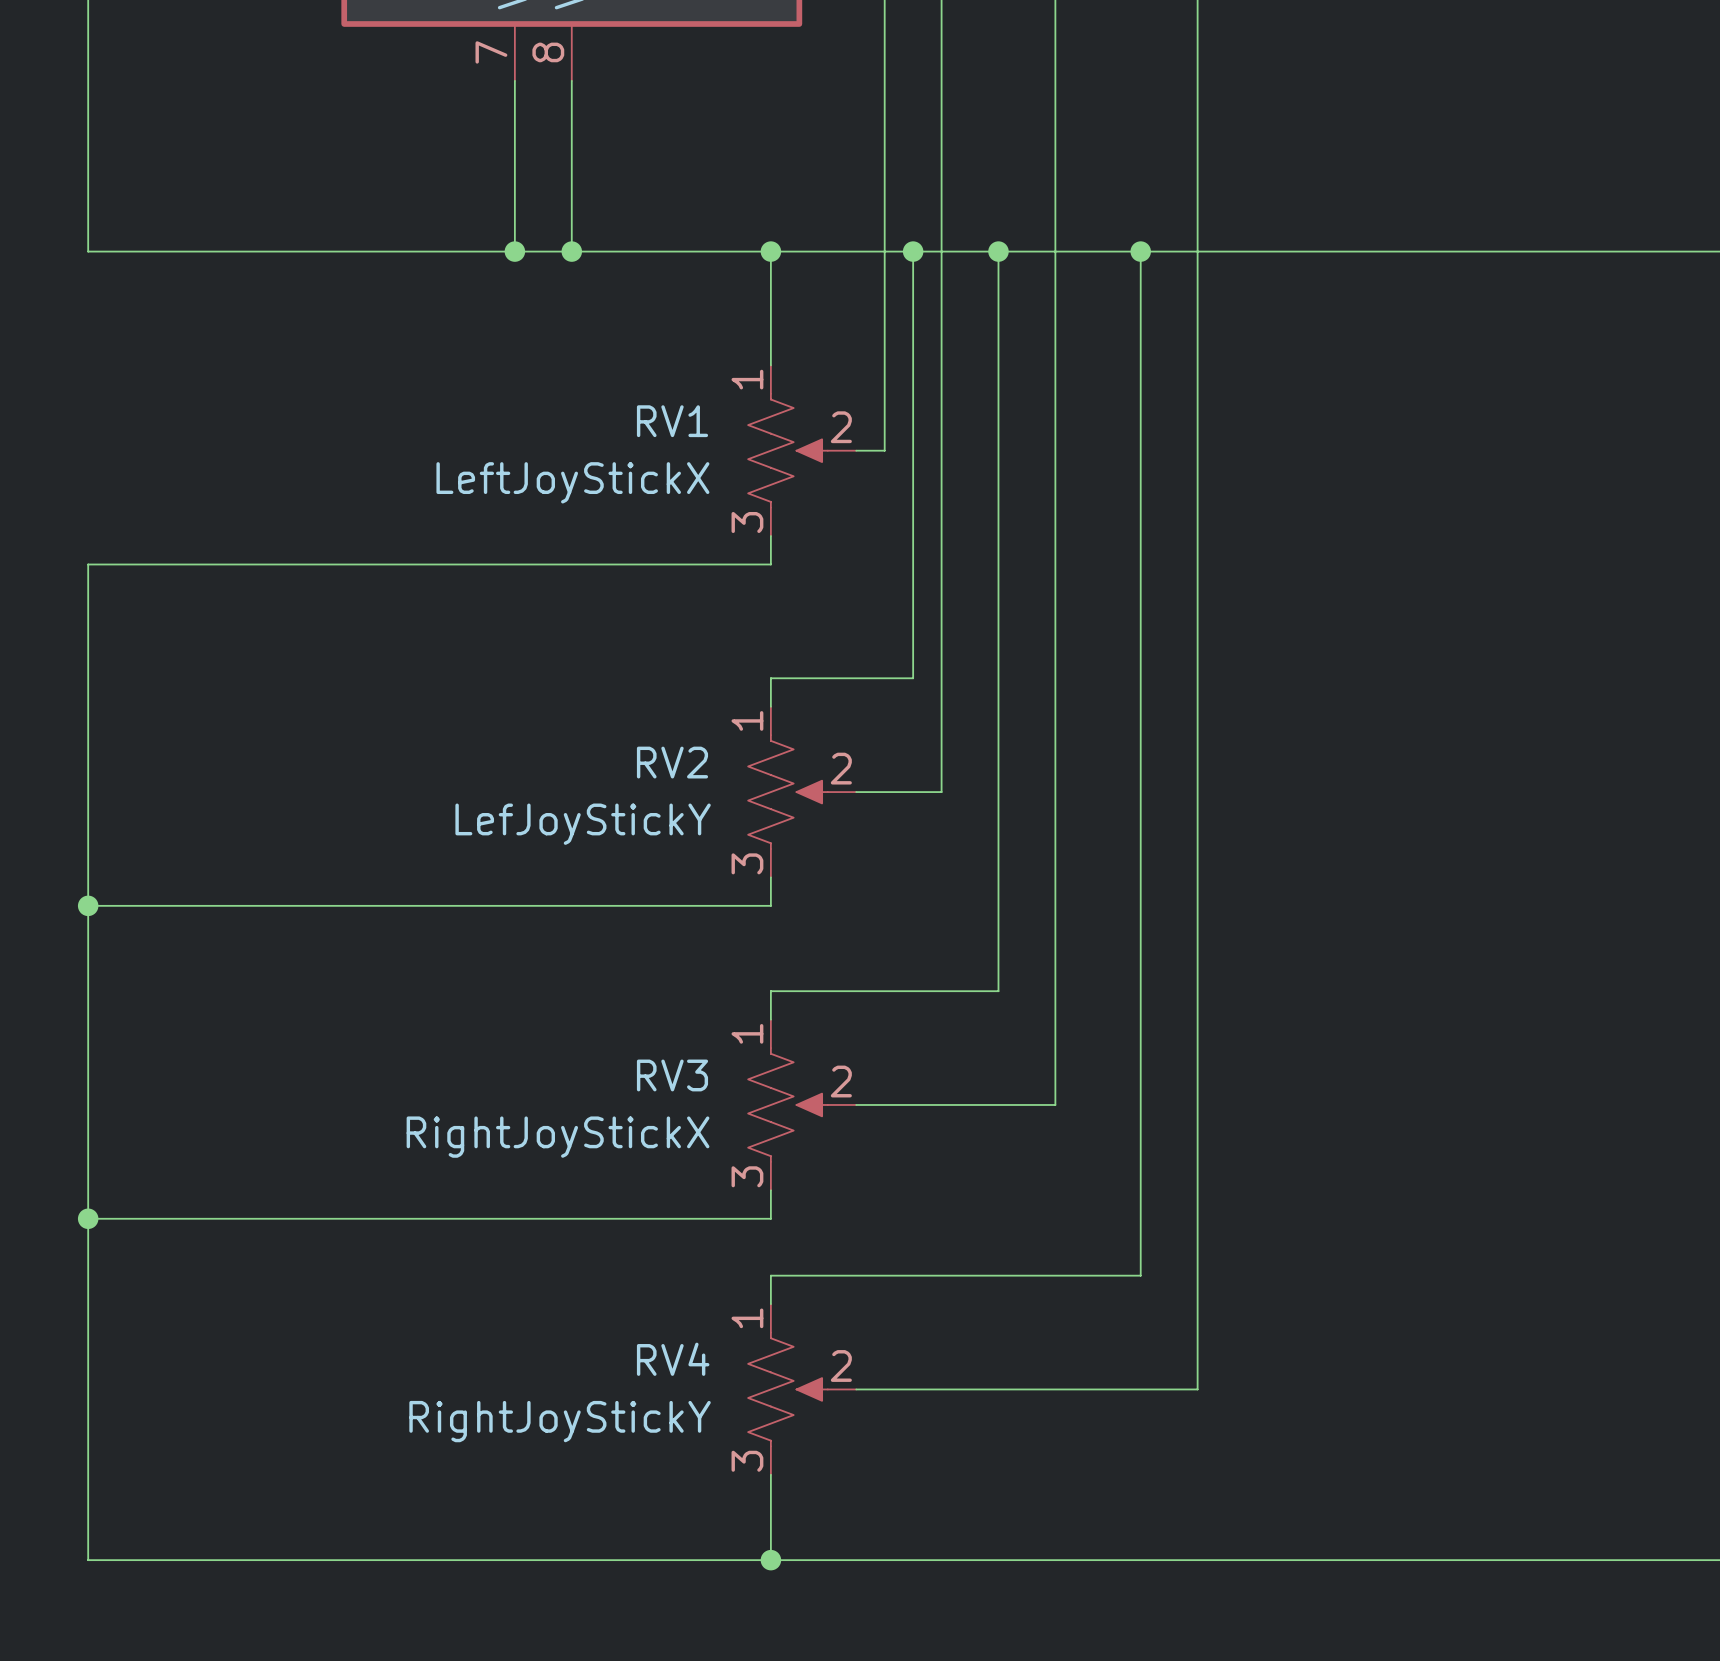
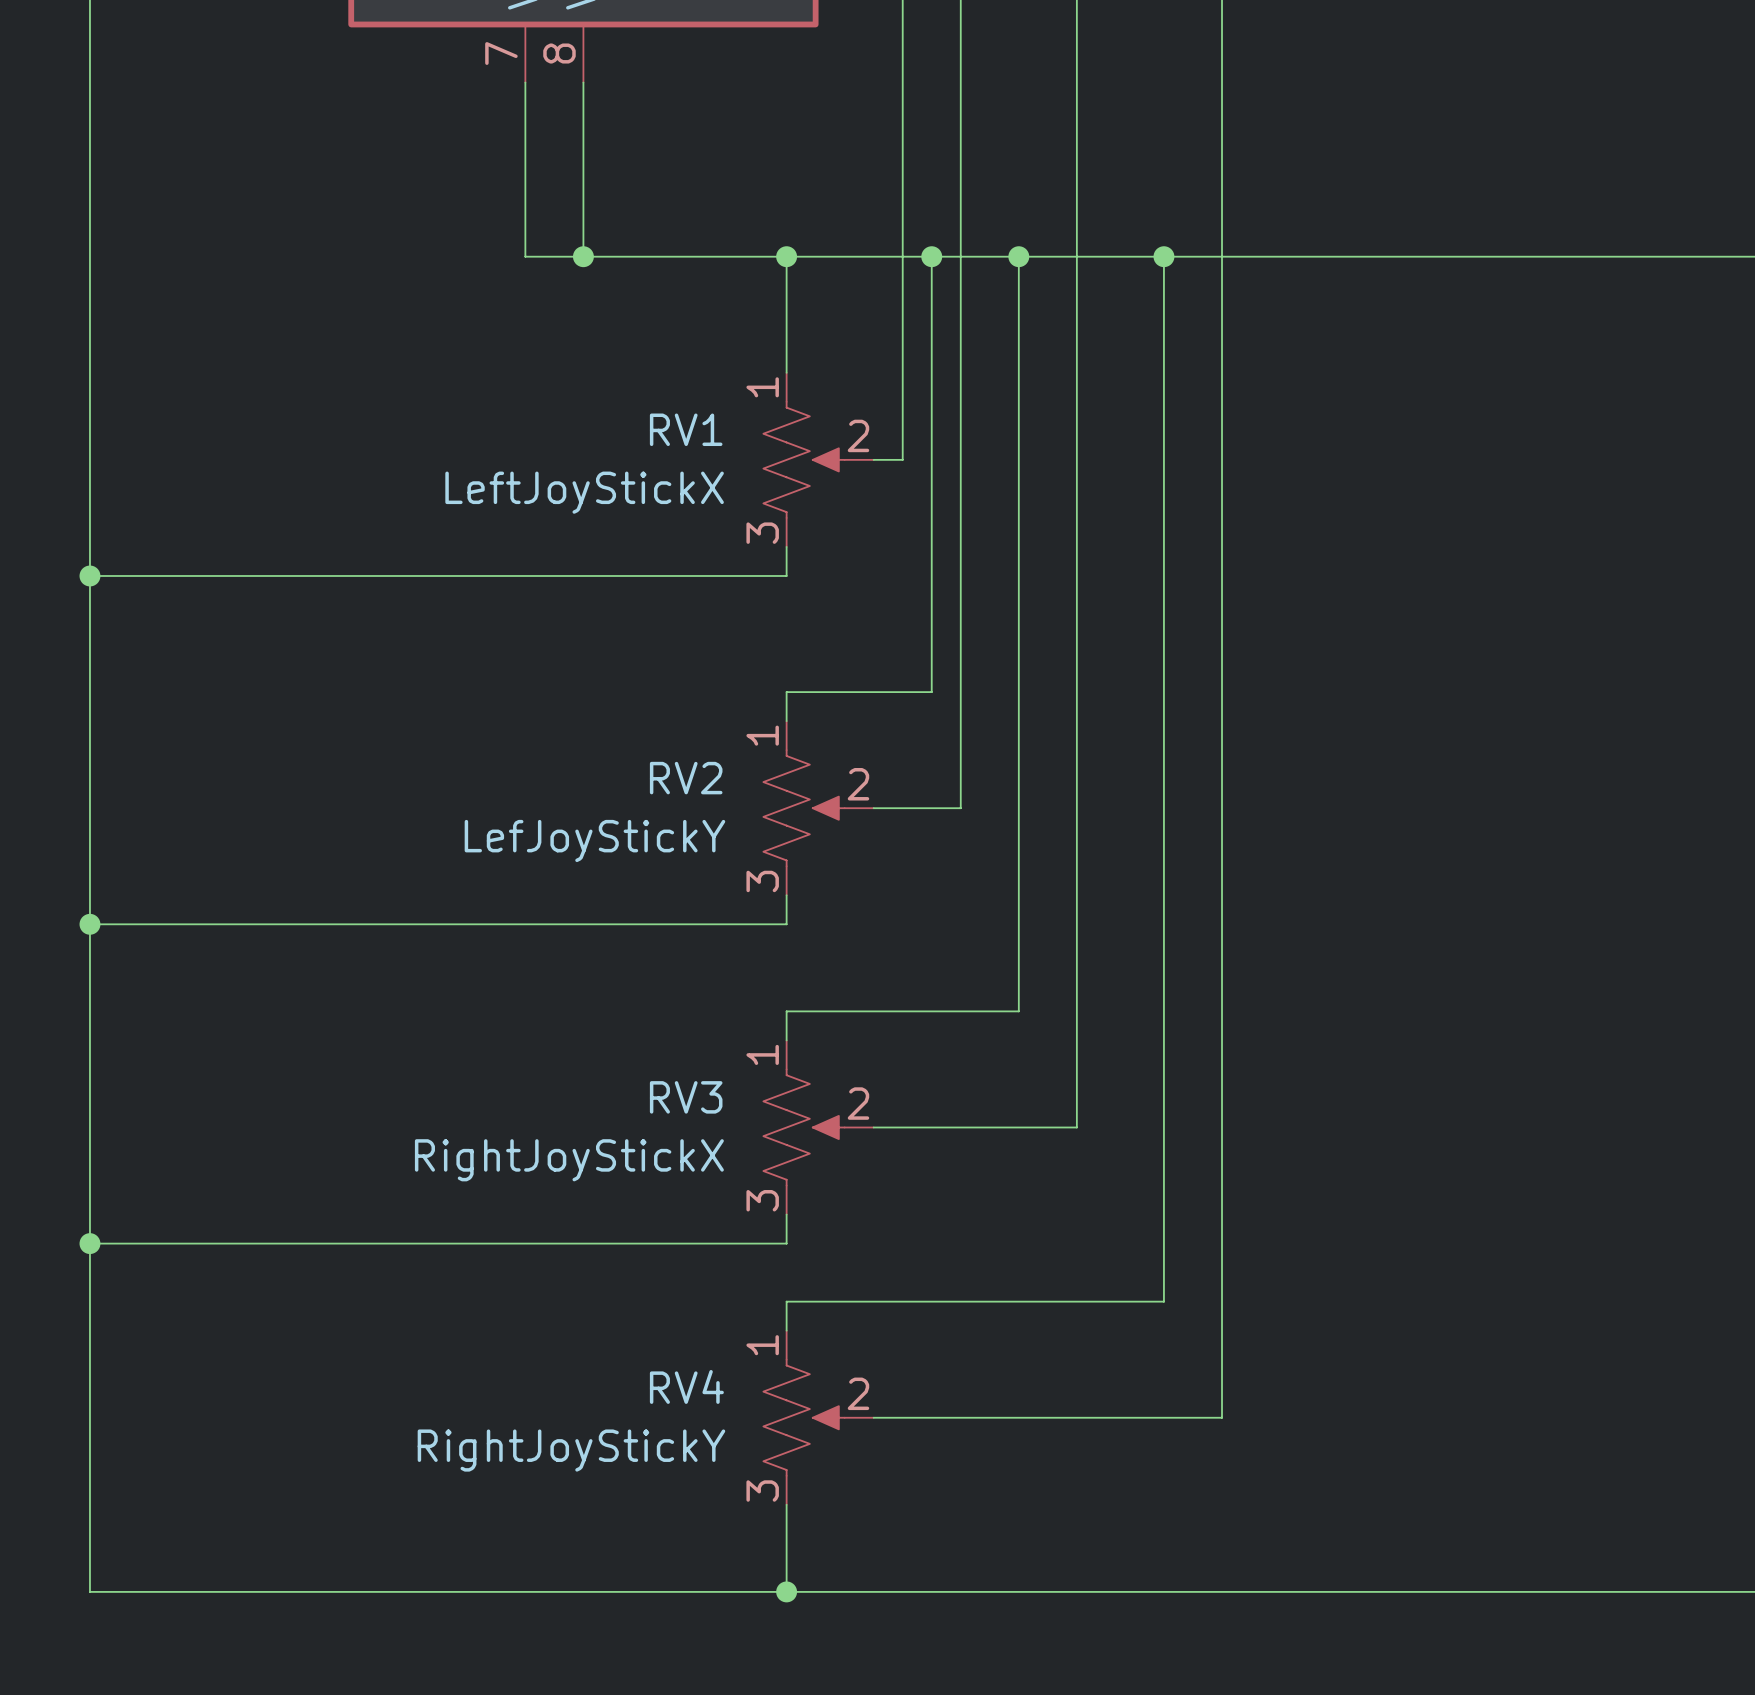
wire: (88, 251) (514, 251) -> (89, 256) (89, 575)
junction: (514, 251) -> none
junction: none -> (89, 575)

